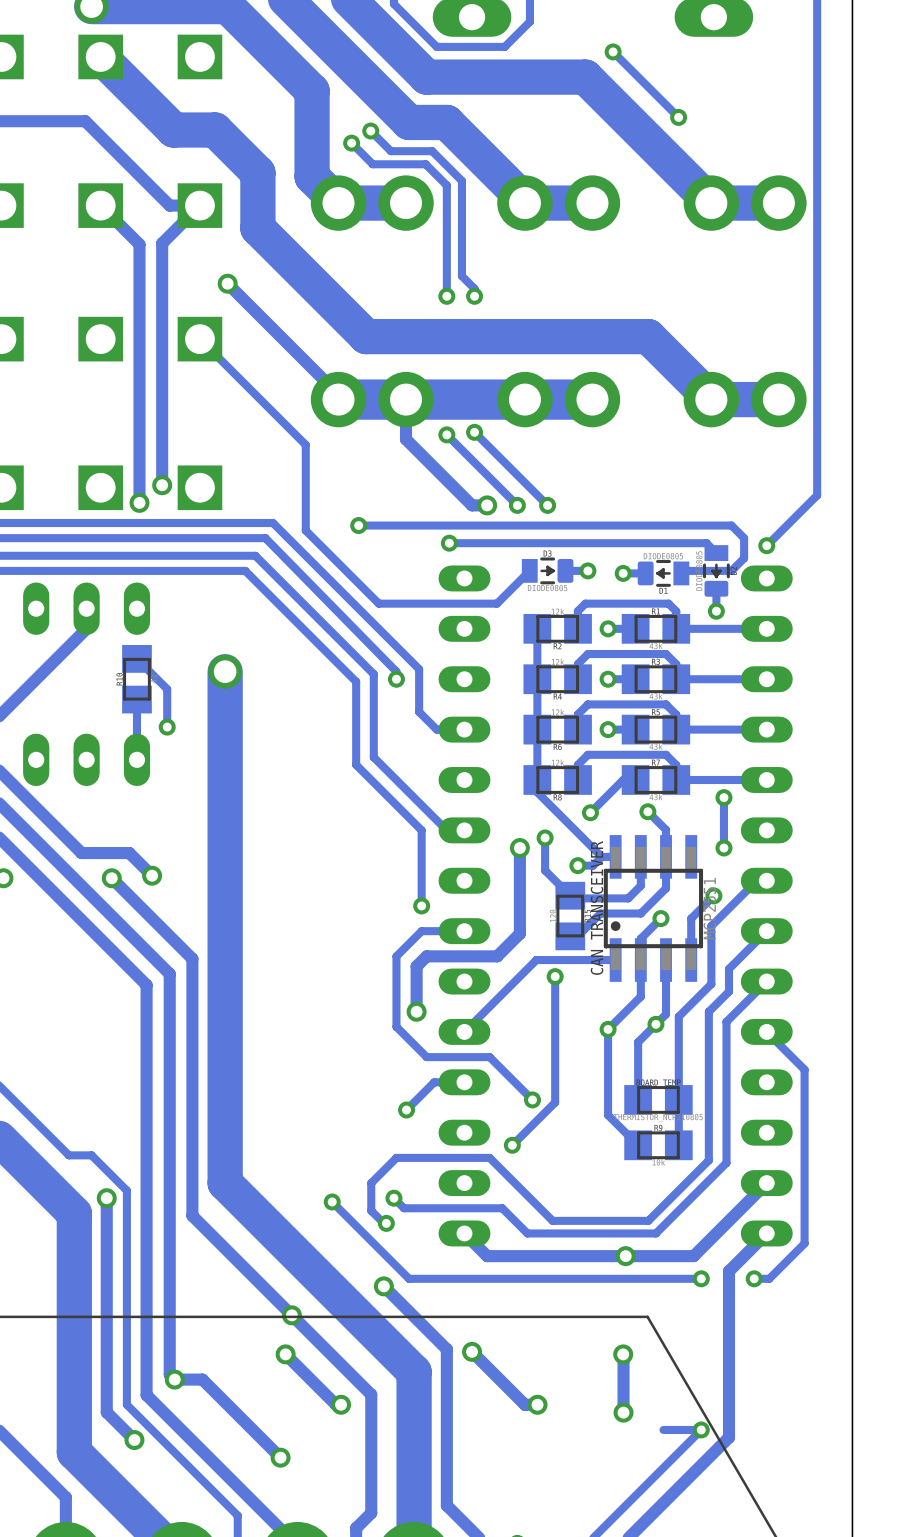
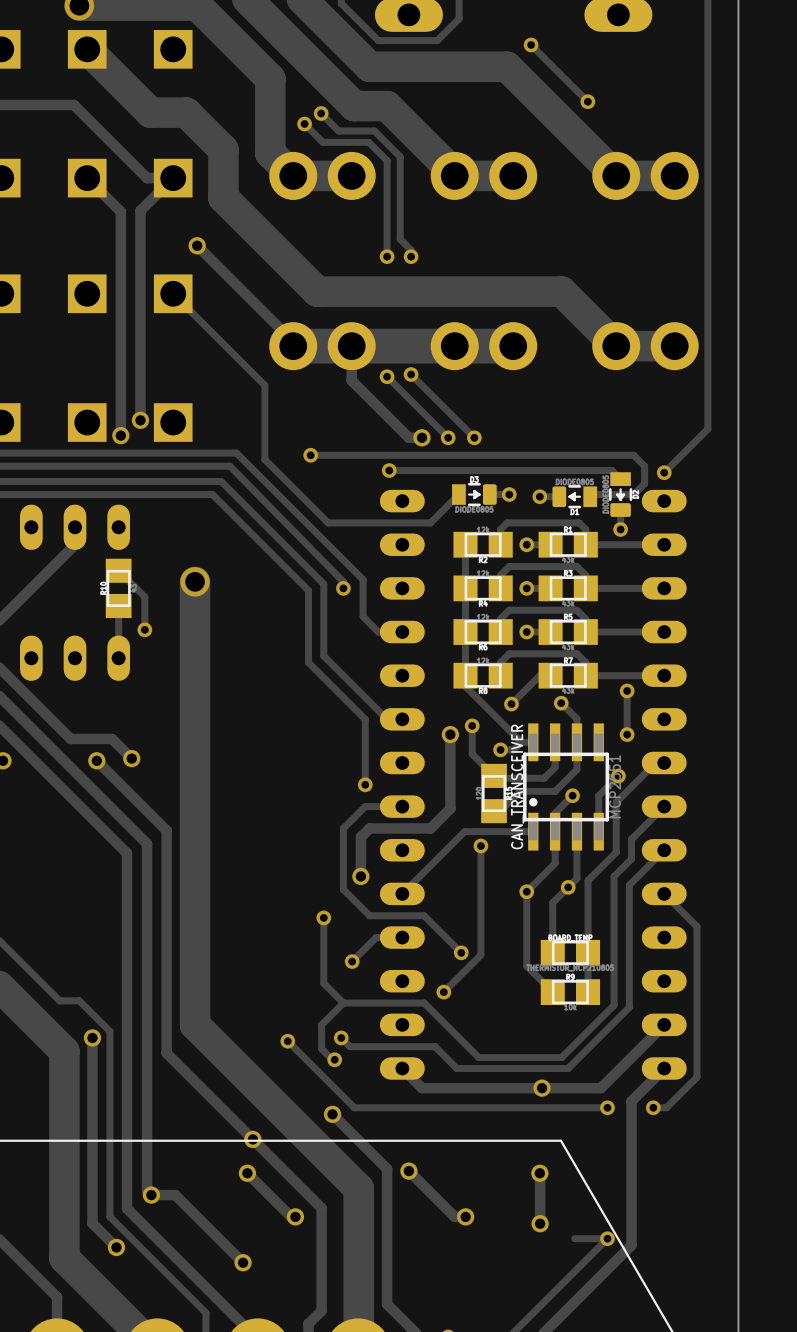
track: none -> (323, 917) (323, 983) (343, 1003)
via: none -> (323, 917)

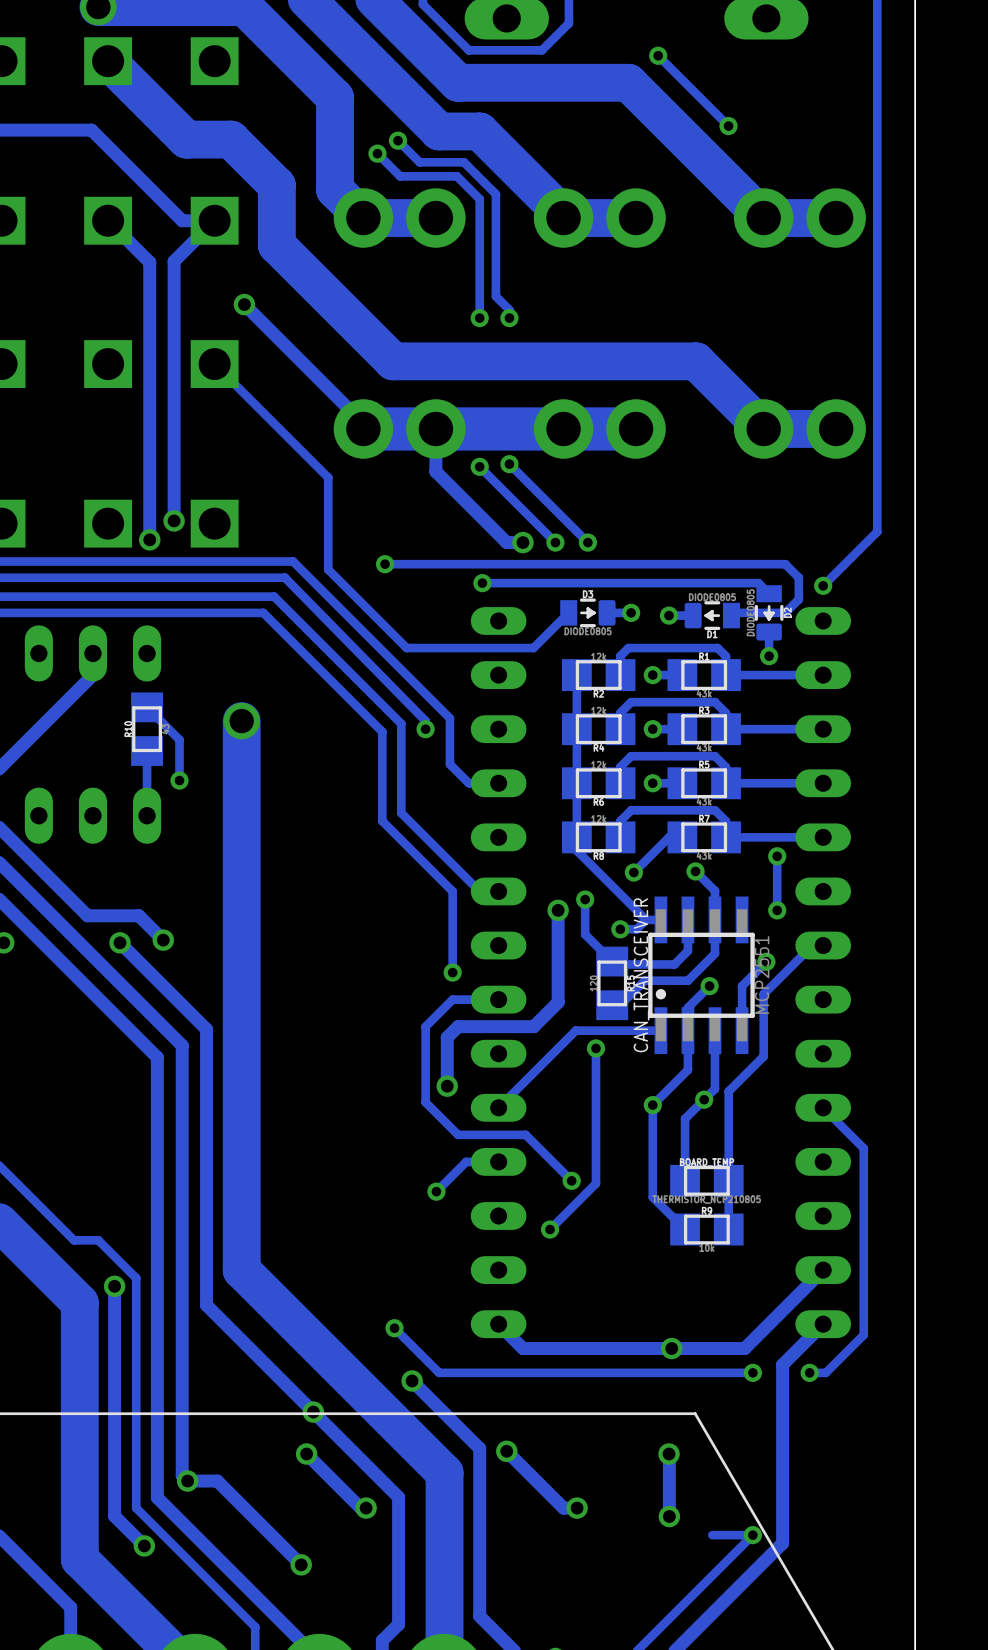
track: (664, 806) (631, 839) (631, 859) (614, 876) (614, 1005) (561, 1057) (478, 1057) (424, 1003) (343, 1003) -> none
track: (664, 850) (629, 885) (629, 1007) (568, 1068) (456, 1068) (435, 1046) (349, 1046) (341, 1037) -> none
track: (323, 917) (323, 983) (343, 1003) -> none
via: (323, 917) -> none
track: (343, 1003) (321, 1024) (321, 1048) (334, 1059) -> none
via: (341, 1037) -> none
track: (287, 1041) (318, 1071) -> none
via: (287, 1041) -> none
via: (334, 1059) -> none
via: none -> (394, 1328)

